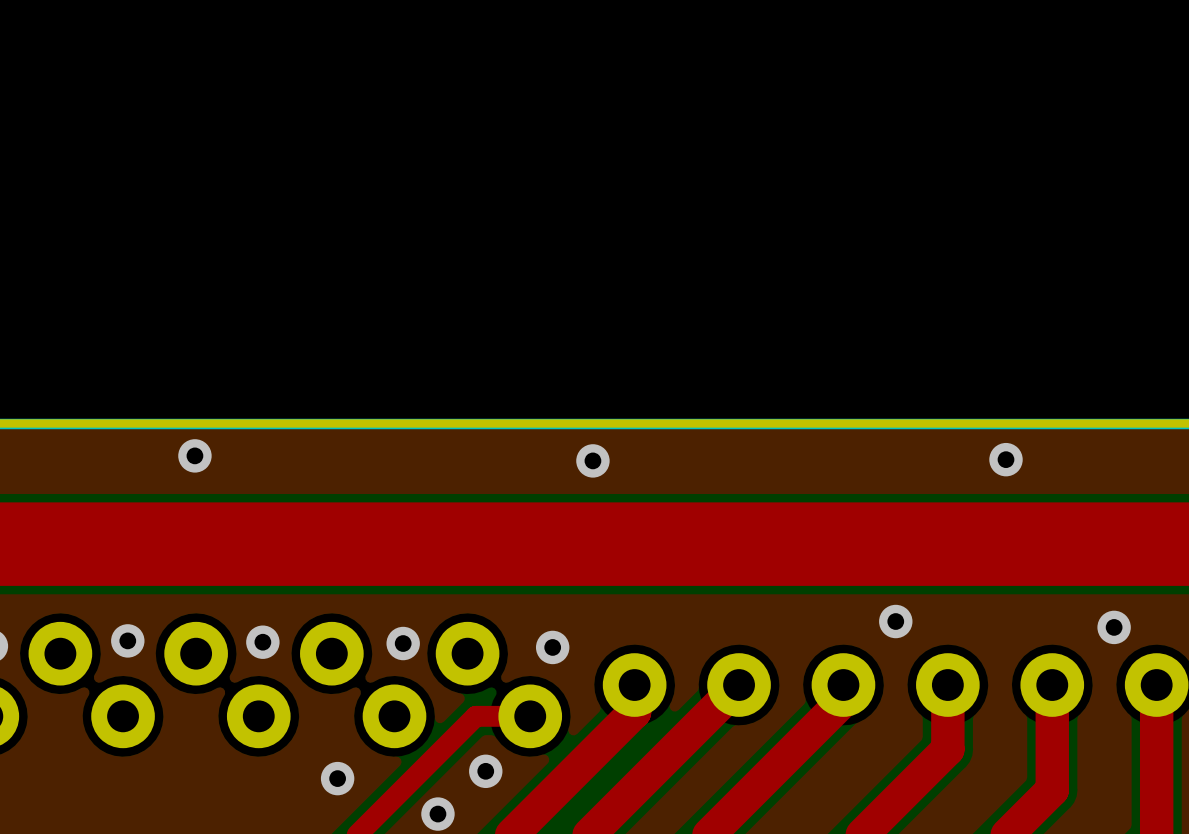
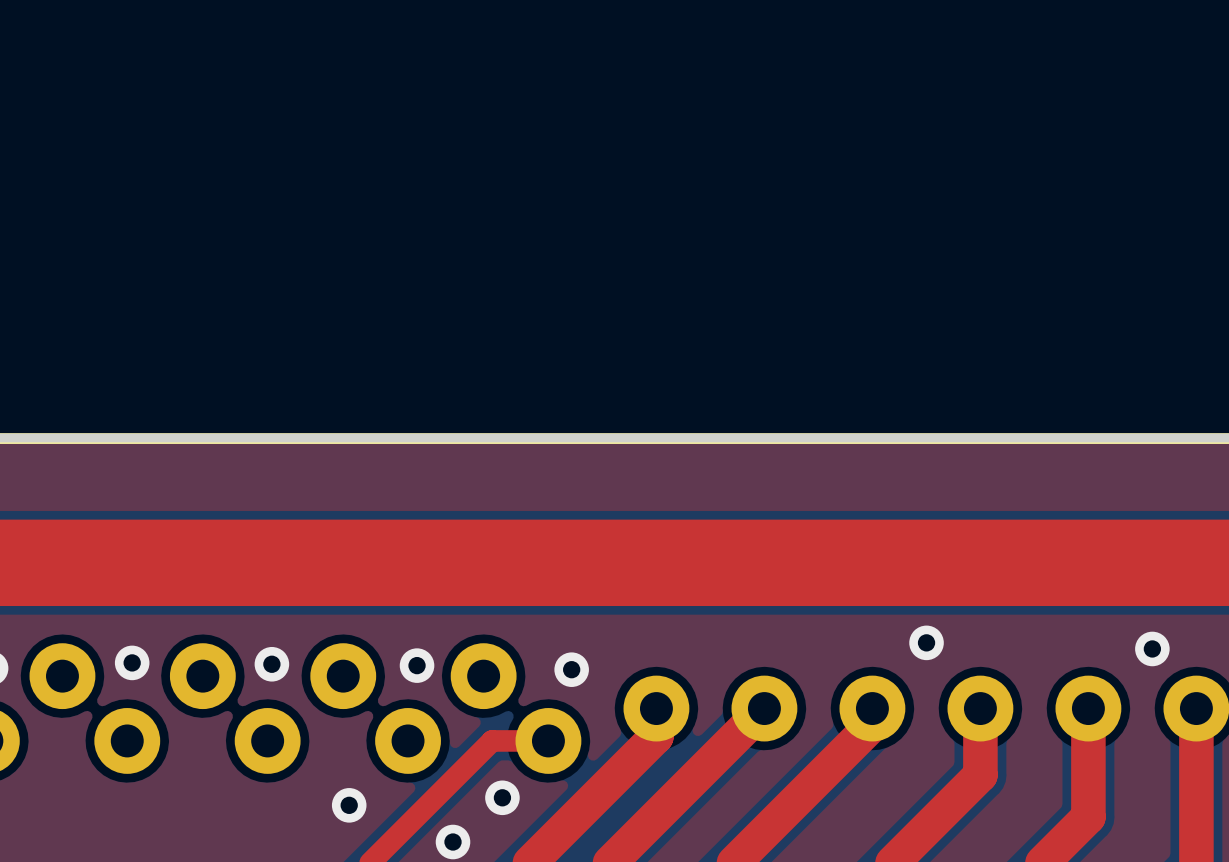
via: (194, 455) -> none
via: (1006, 459) -> none
via: (592, 460) -> none

